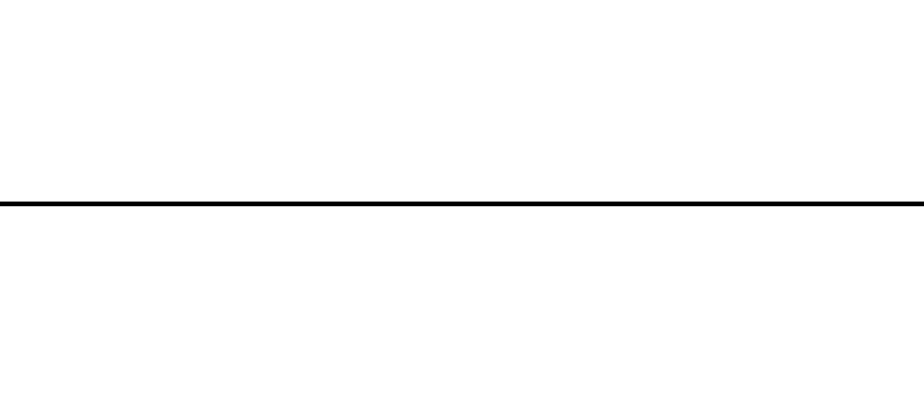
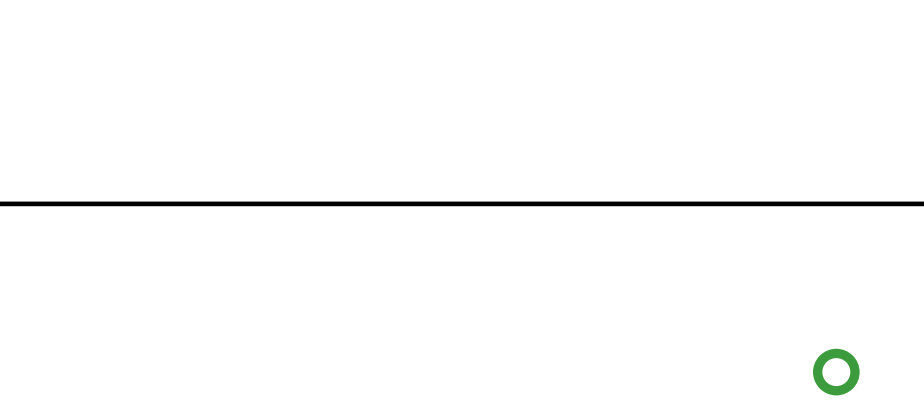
via: none -> (836, 372)

